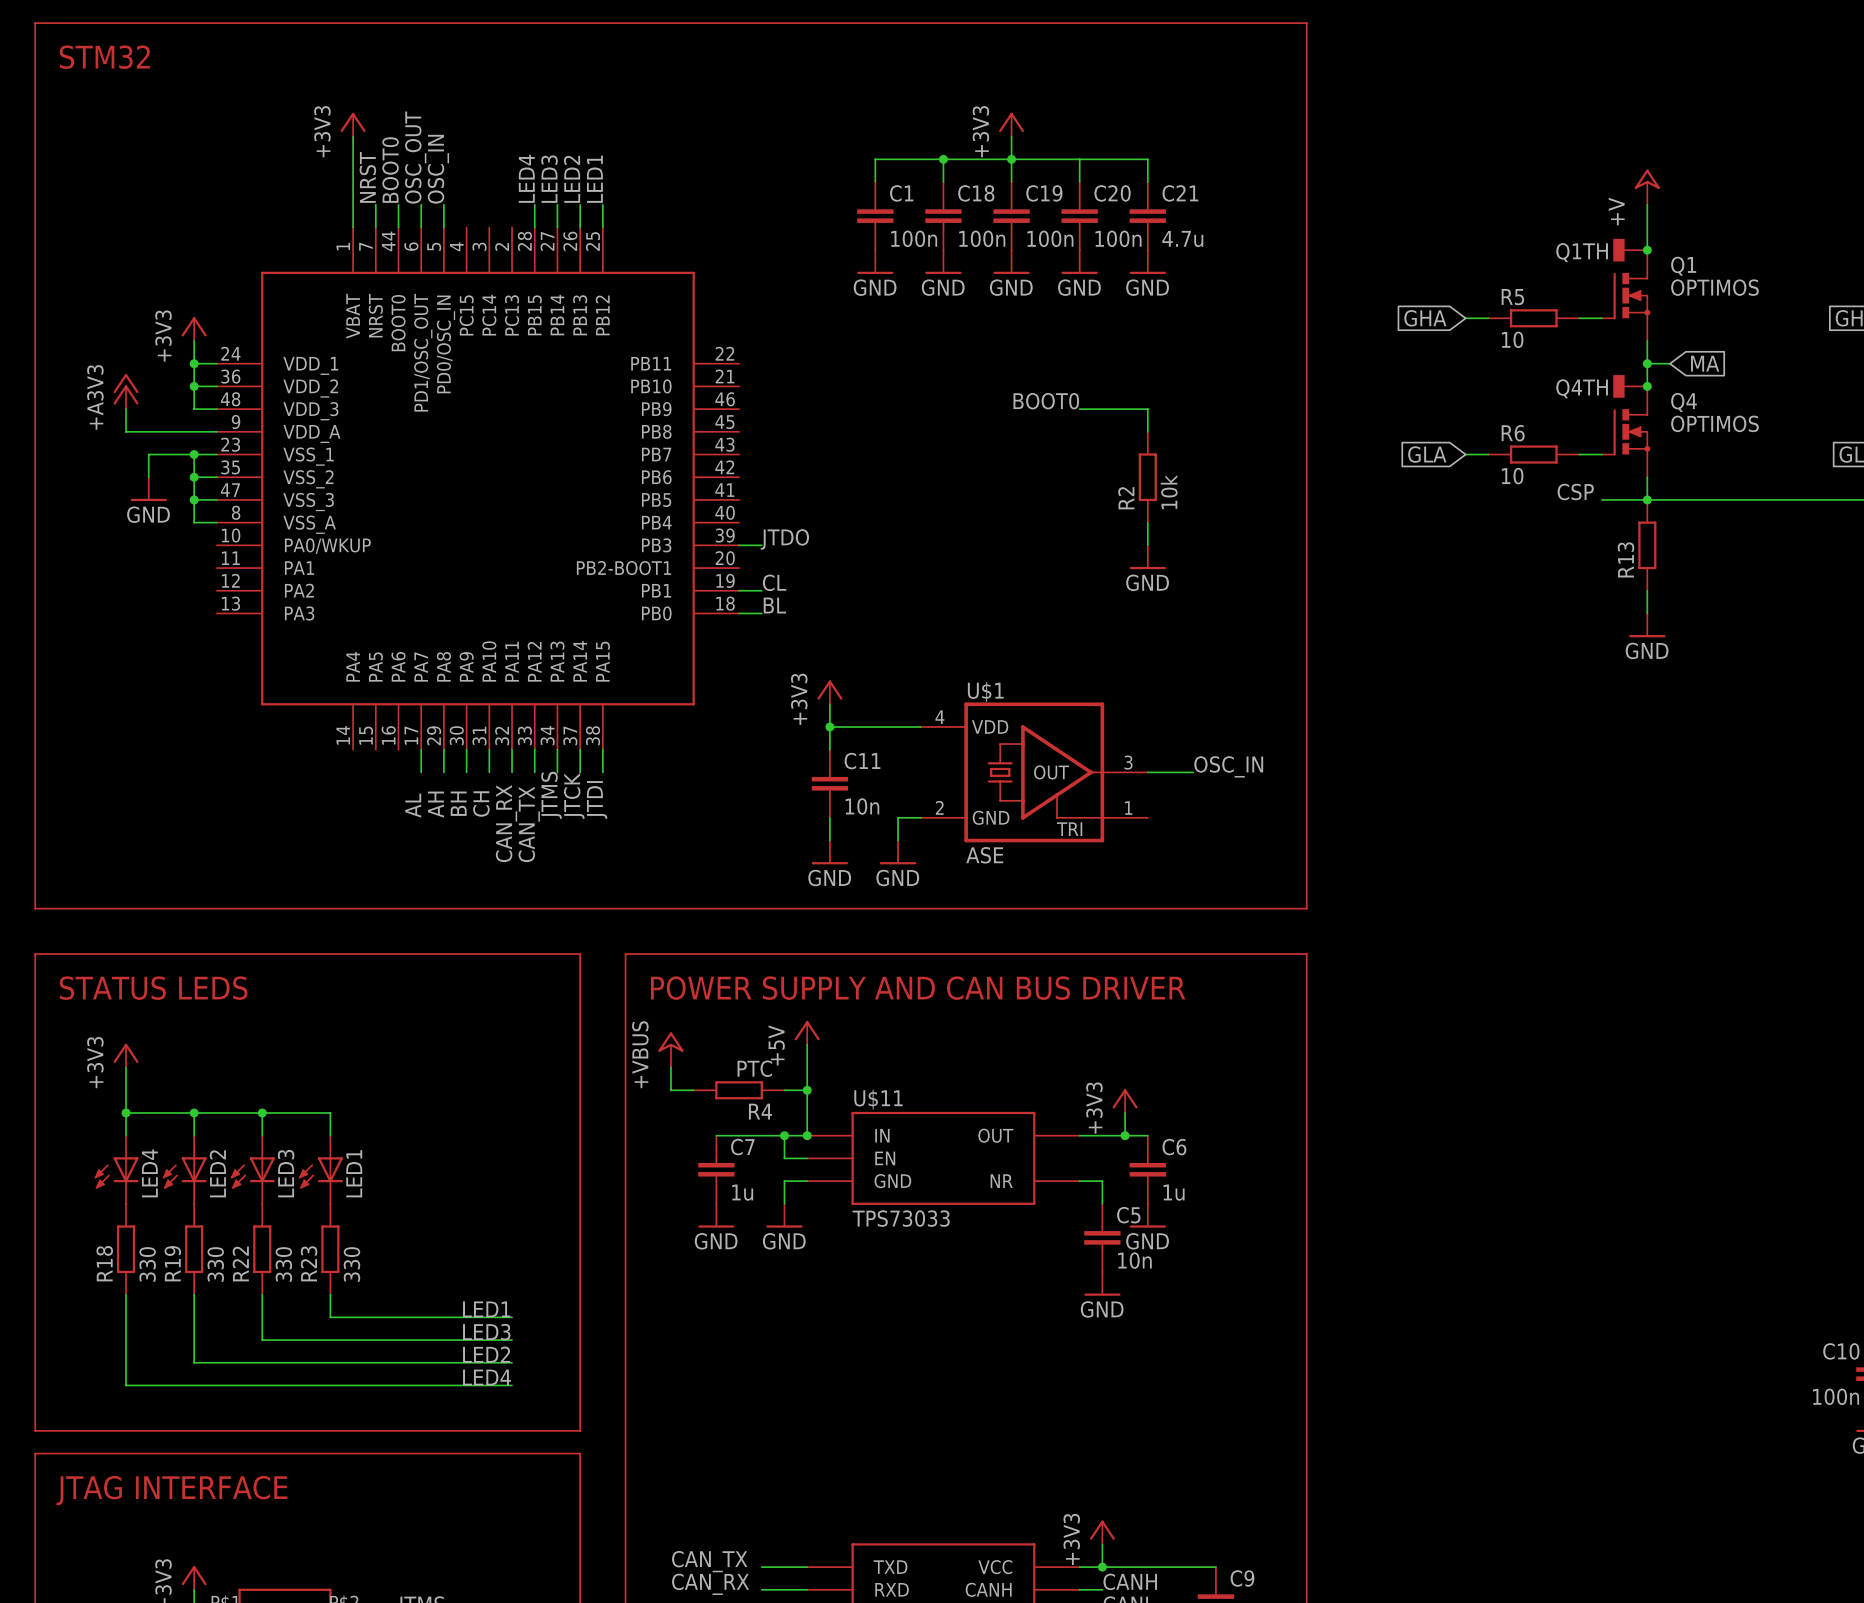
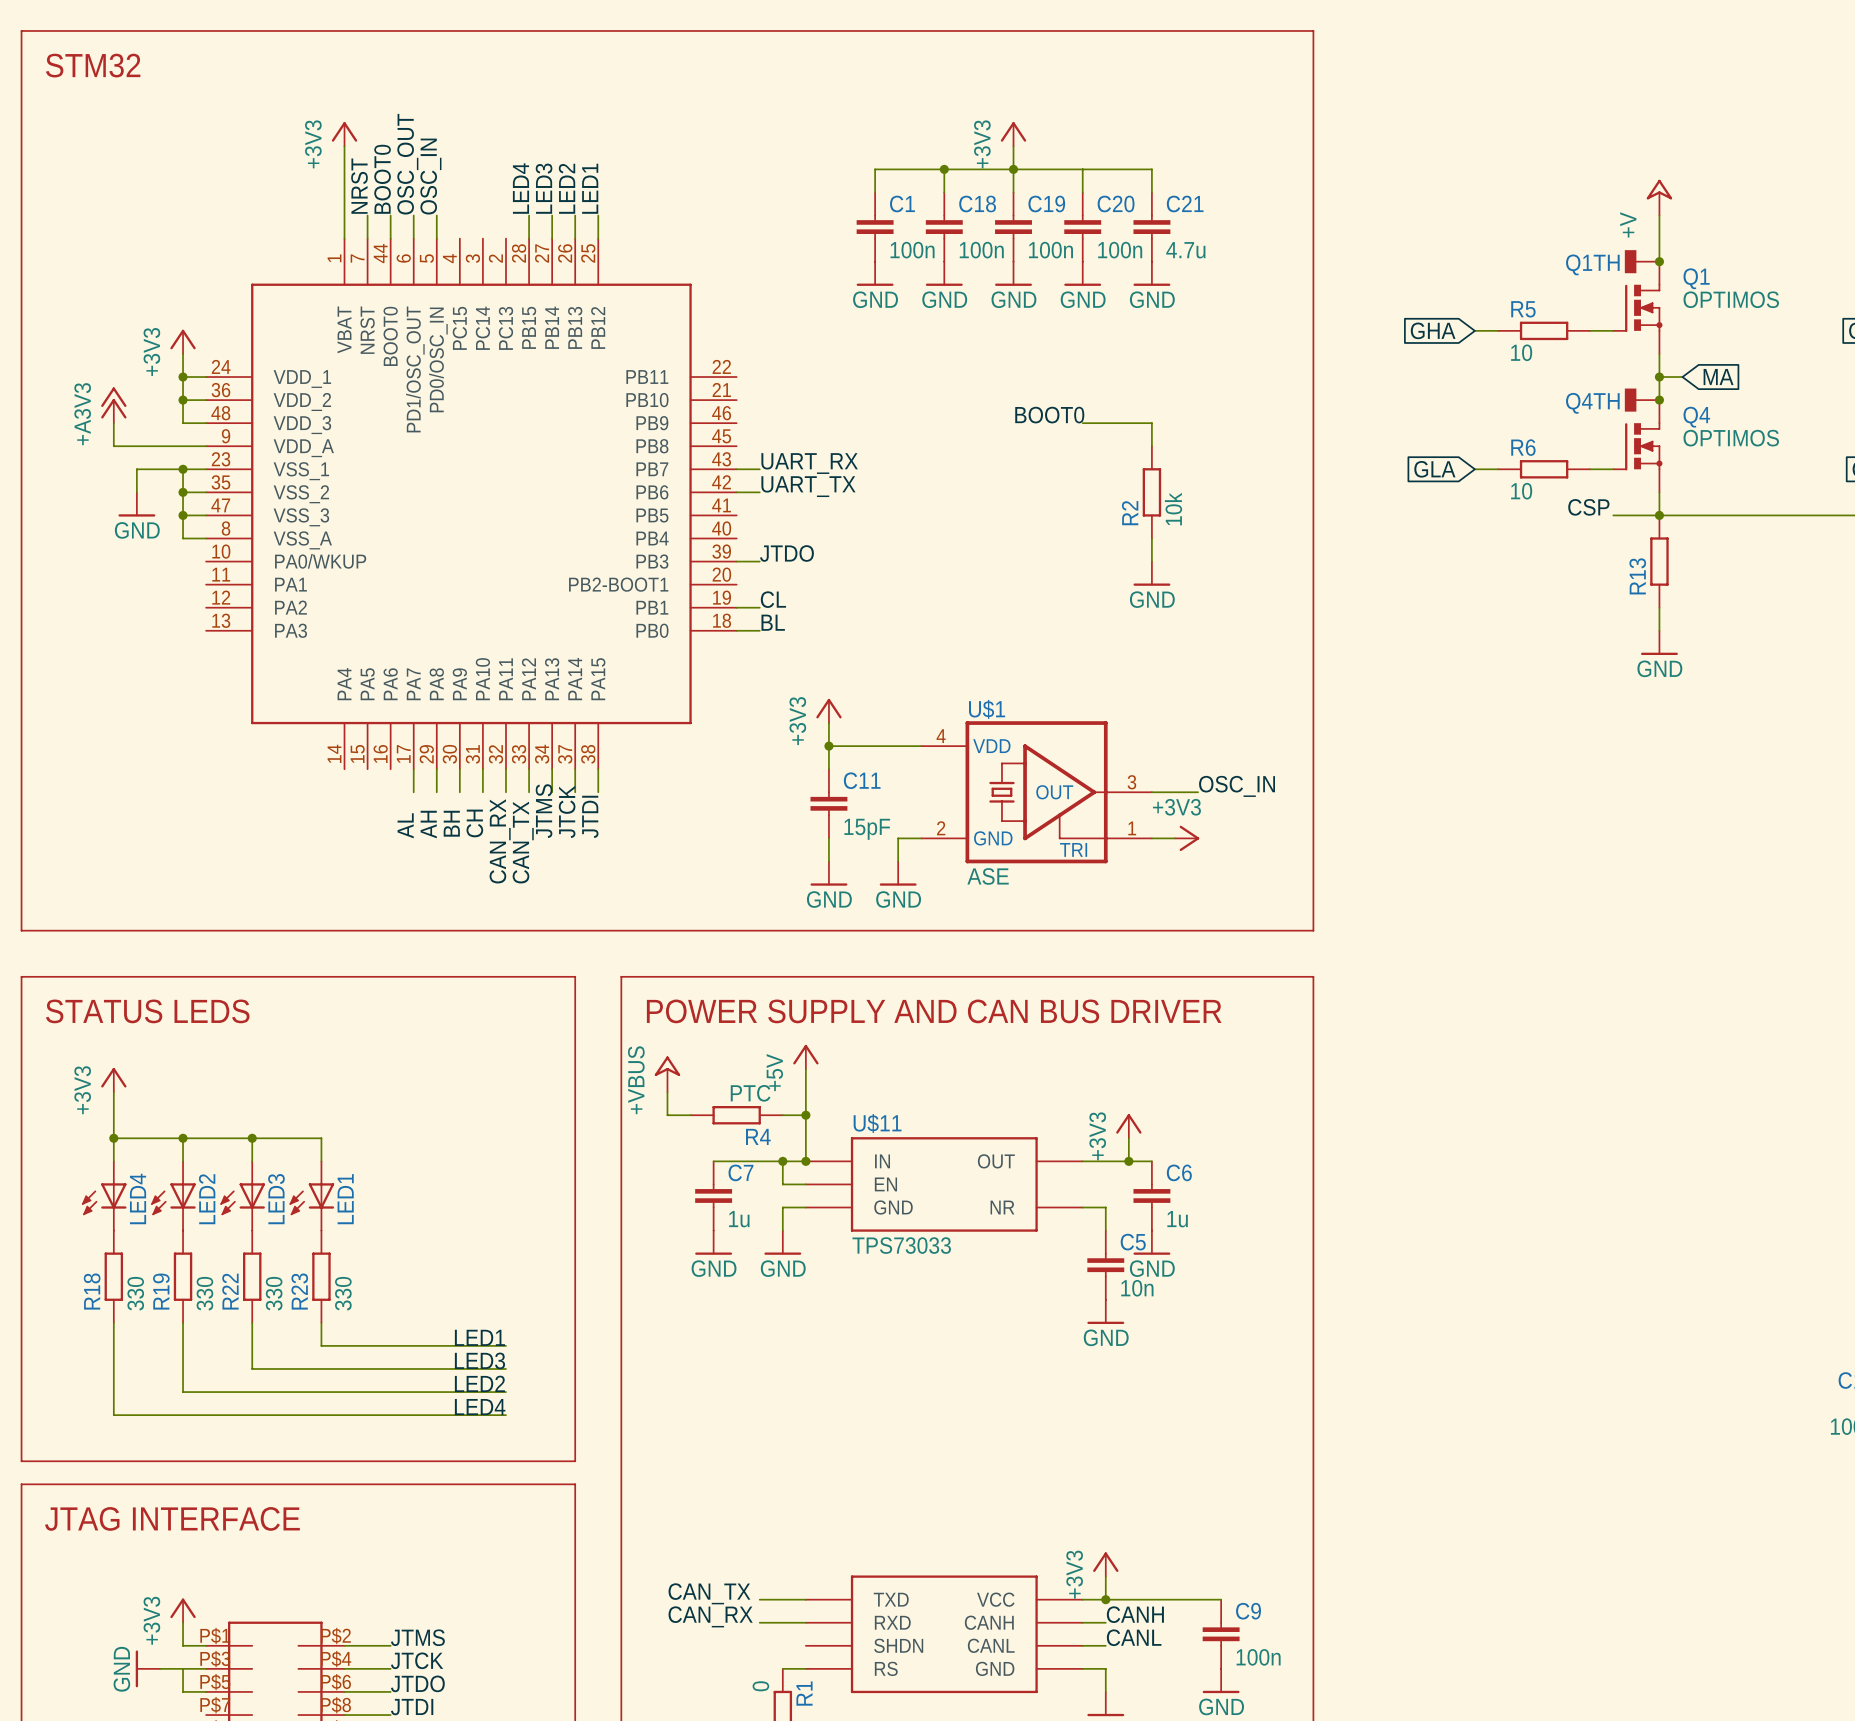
label: none -> UART_RX (809, 463)
wire: none -> (736, 469) (759, 469)
label: none -> UART_TX (808, 486)
wire: none -> (736, 492) (759, 492)
C11 value: 10n (862, 806) -> 15pF (867, 829)
wire: none -> (1151, 838) (1174, 838)
power symbol: none -> +3V3 (1187, 838)

